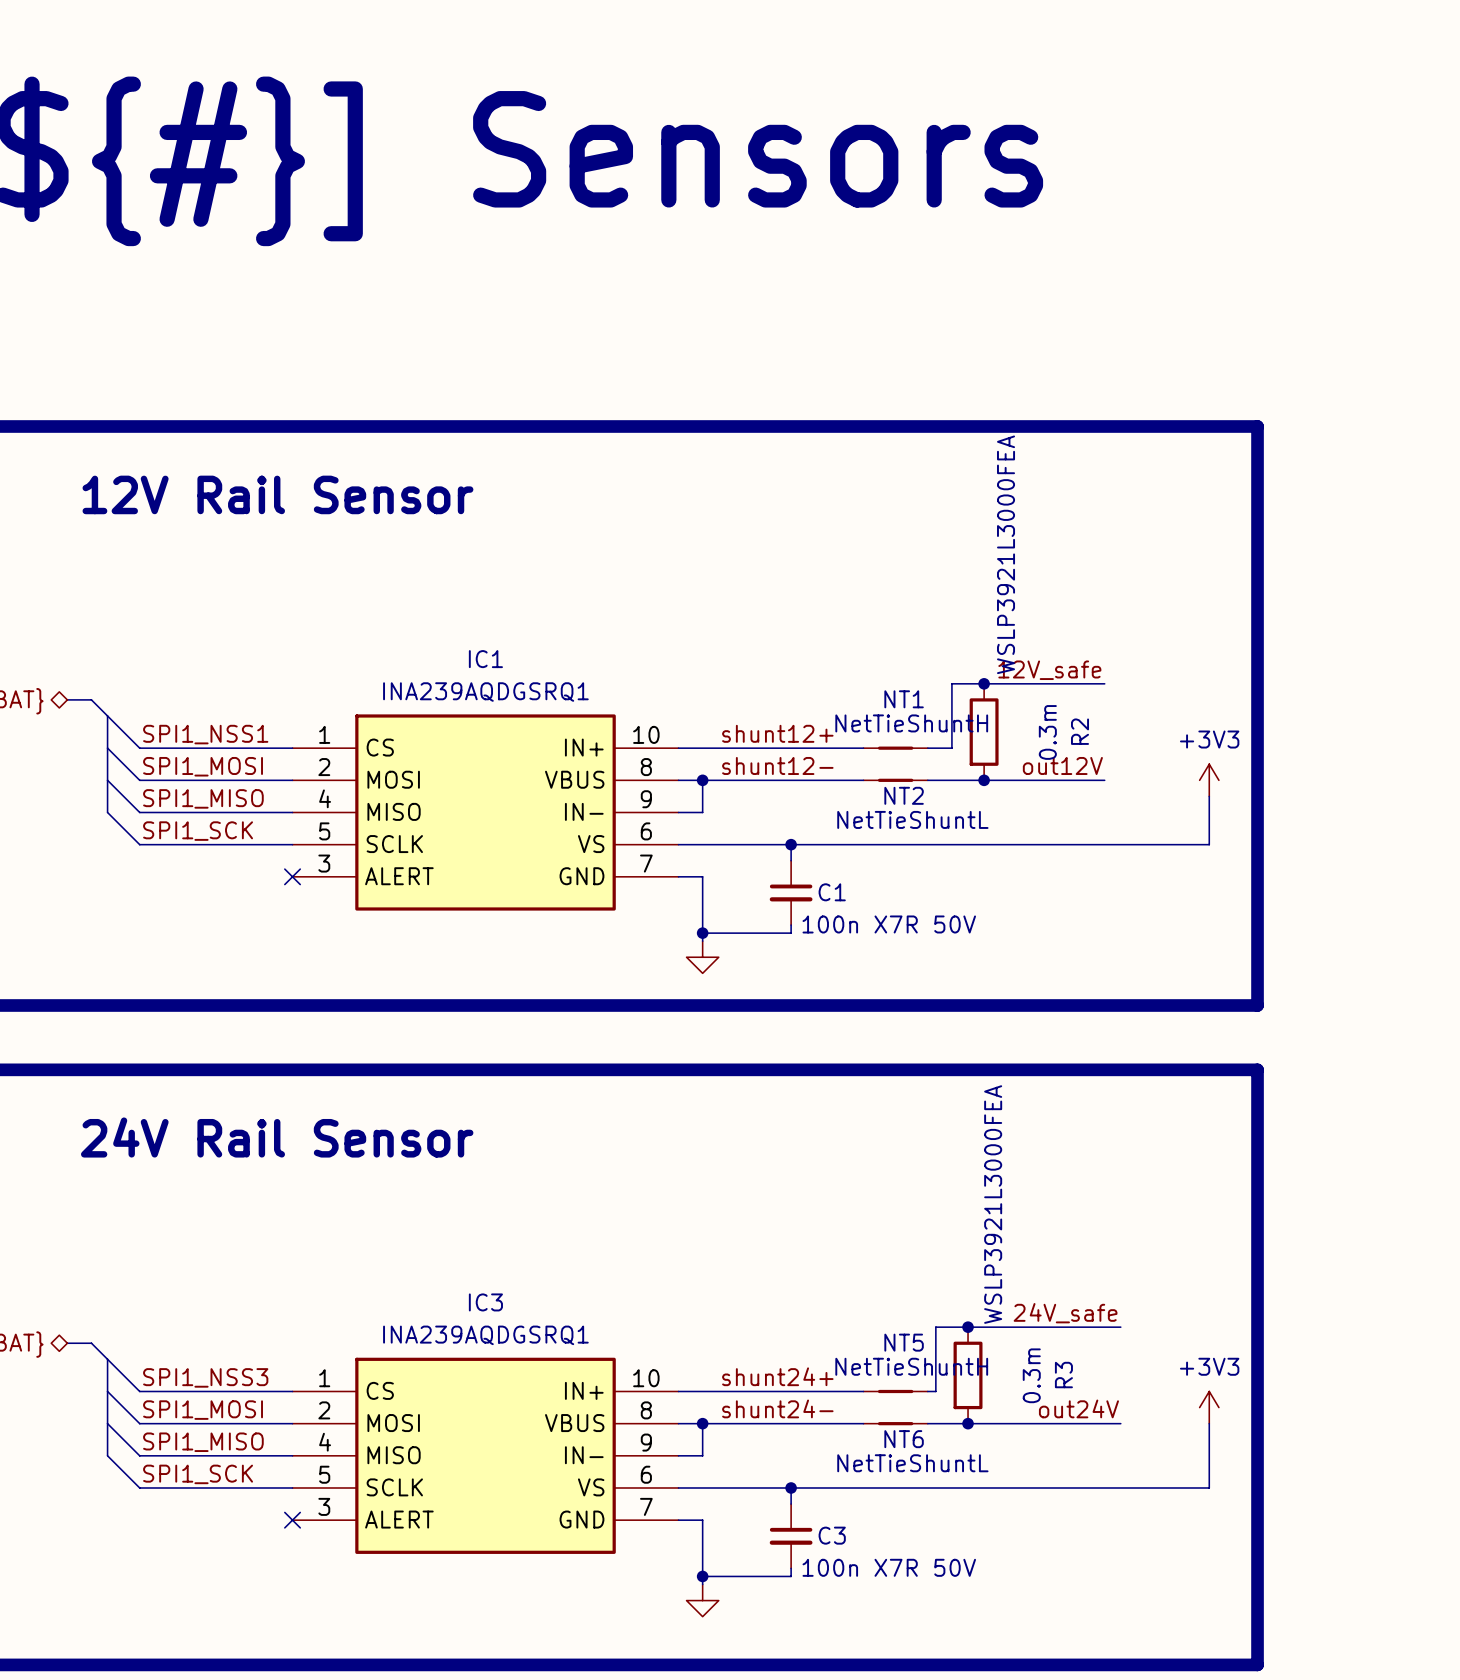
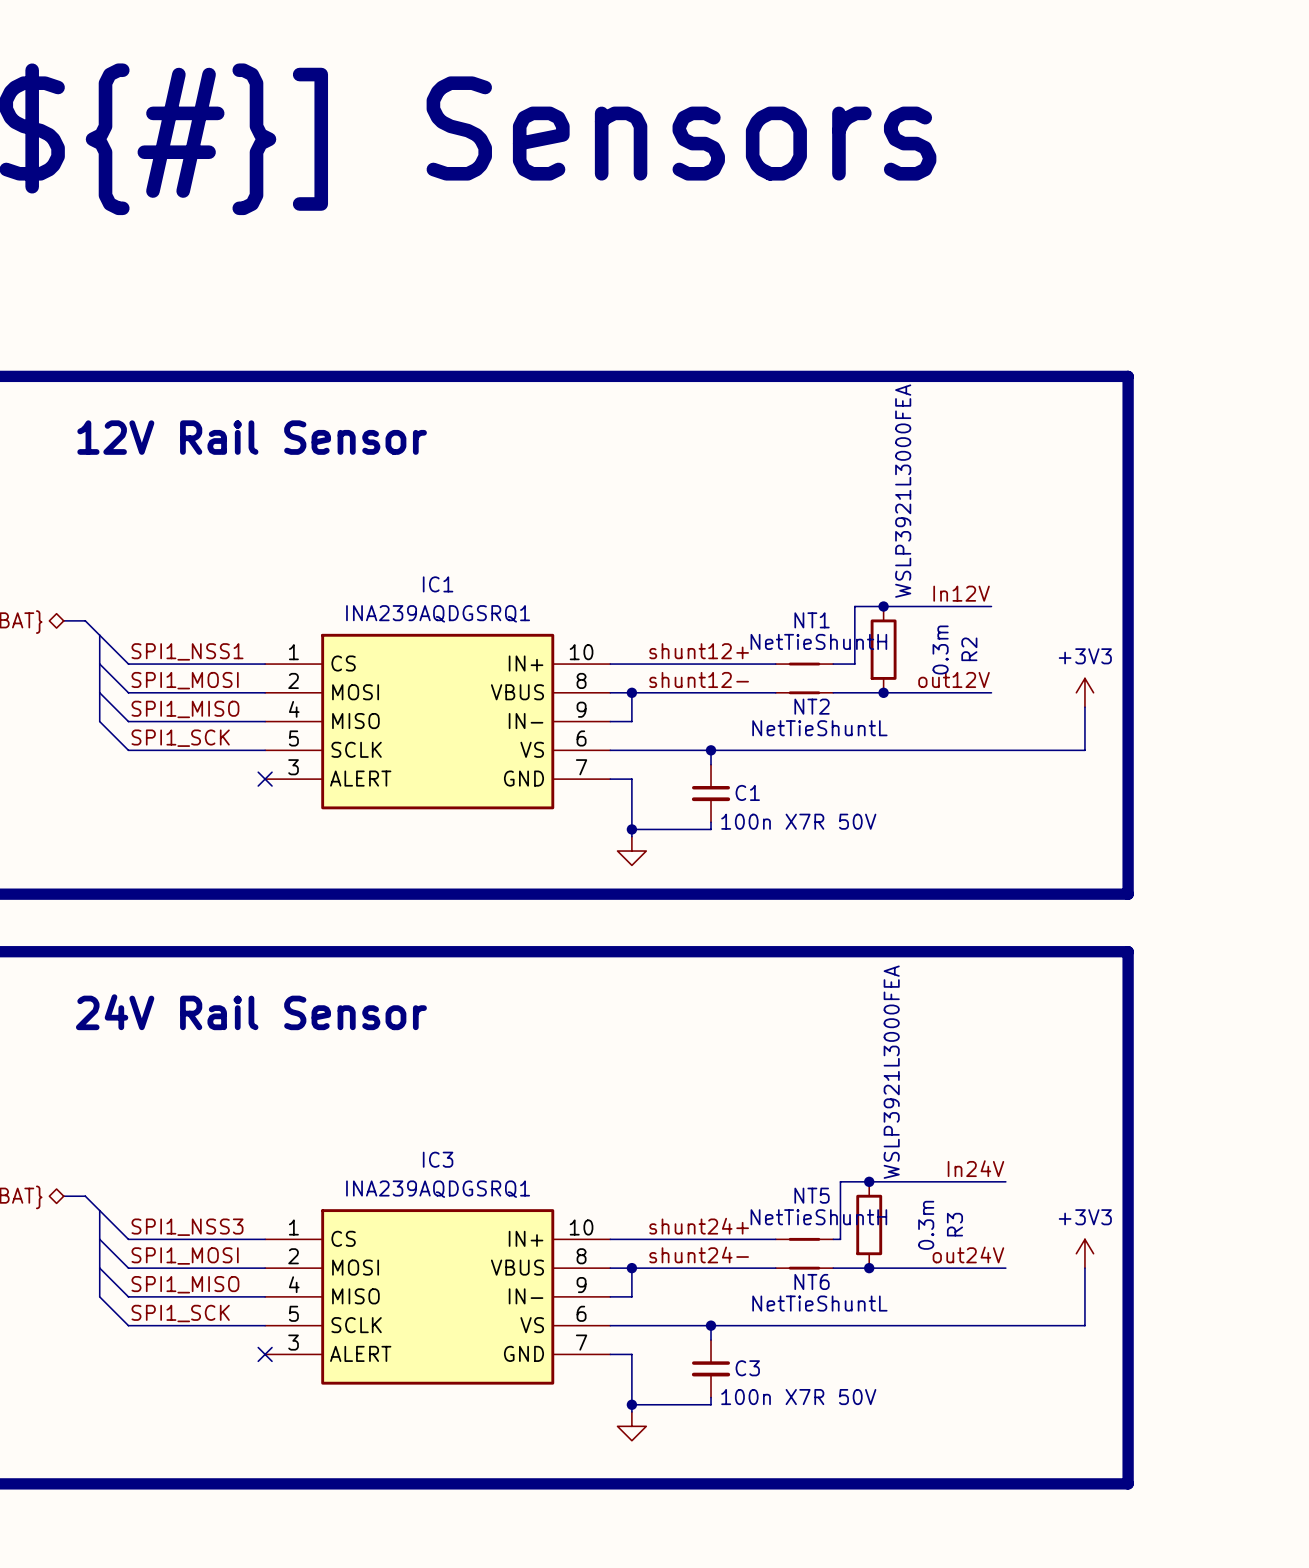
label: 12V_safe (1049, 670) -> In12V (961, 593)
label: 24V_safe (1065, 1313) -> In24V (975, 1168)

